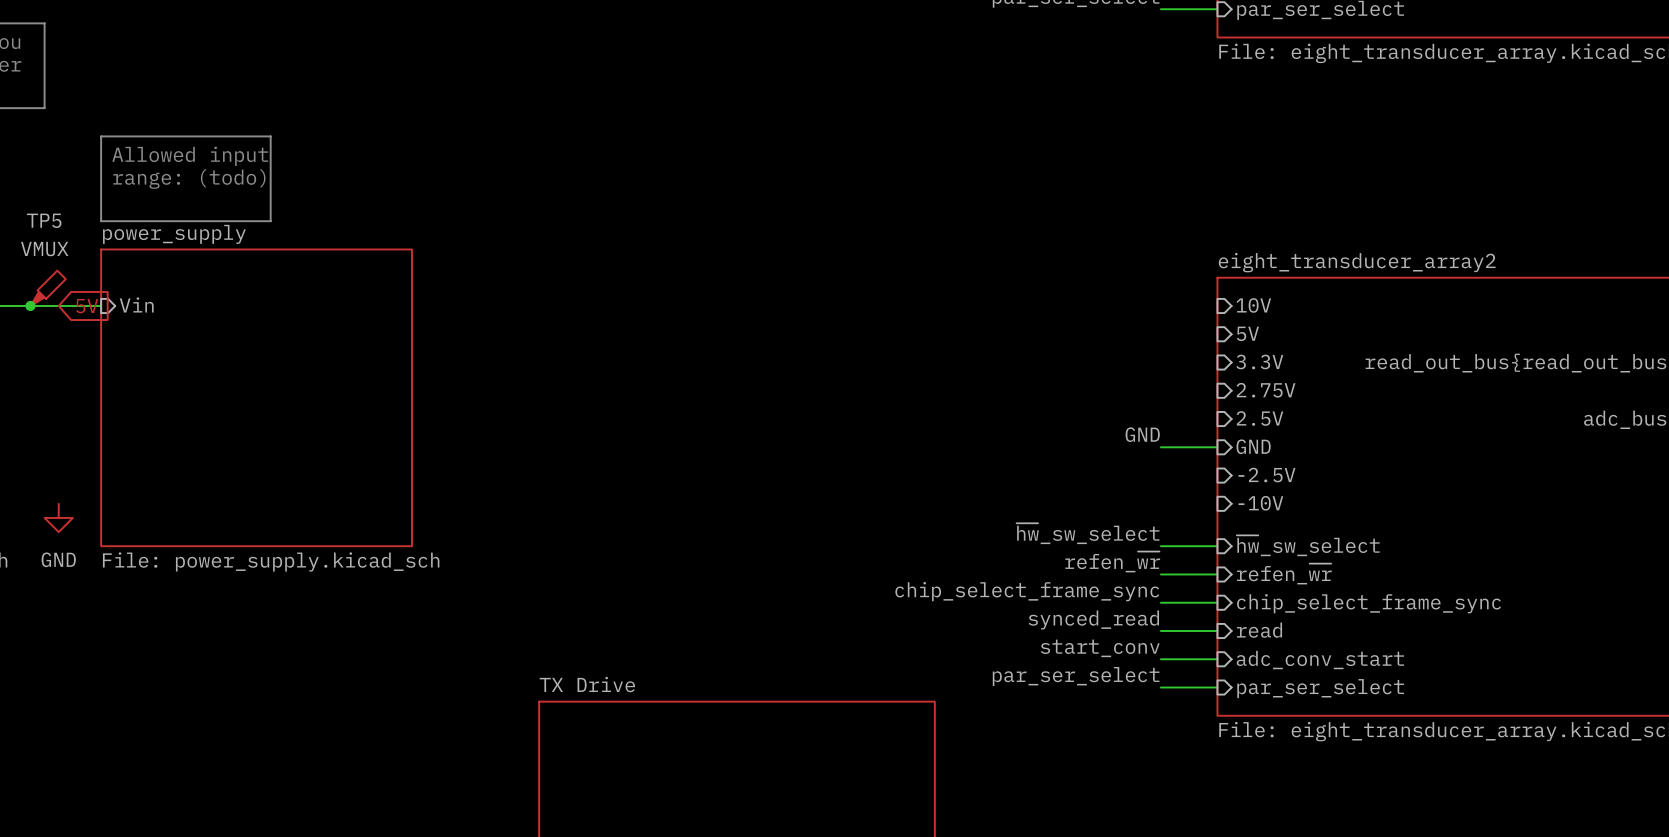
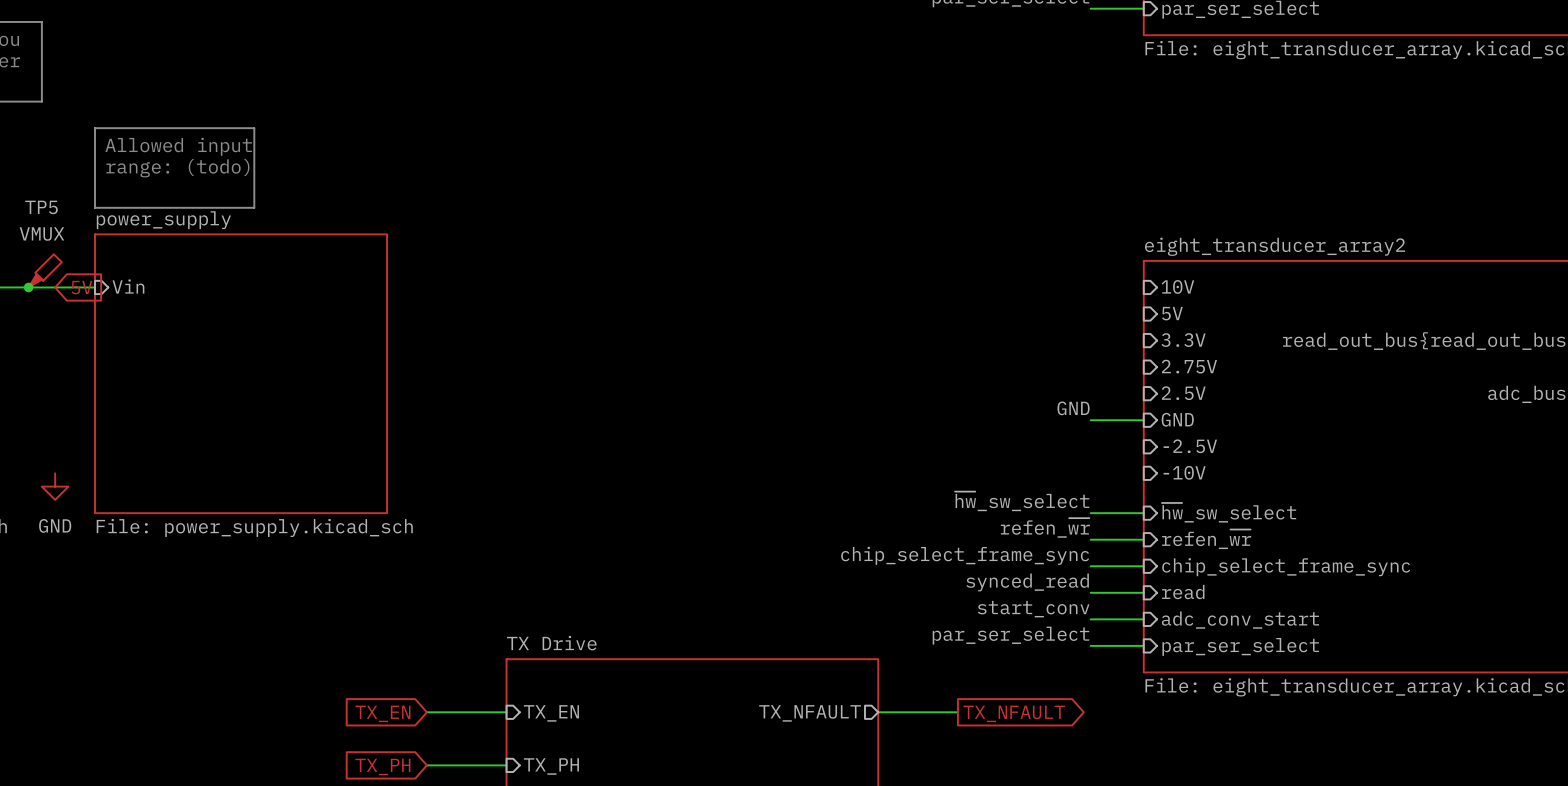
wire: none -> (426, 712) (506, 712)
wire: none -> (878, 712) (957, 712)
global label: none -> TX_EN (382, 713)
sheet pin: none -> TX_EN (551, 713)
sheet pin: none -> TX_NFAULT (810, 713)
global label: none -> TX_NFAULT (1014, 713)
wire: none -> (426, 765) (506, 765)
sheet pin: none -> TX_PH (551, 766)
global label: none -> TX_PH (382, 767)

